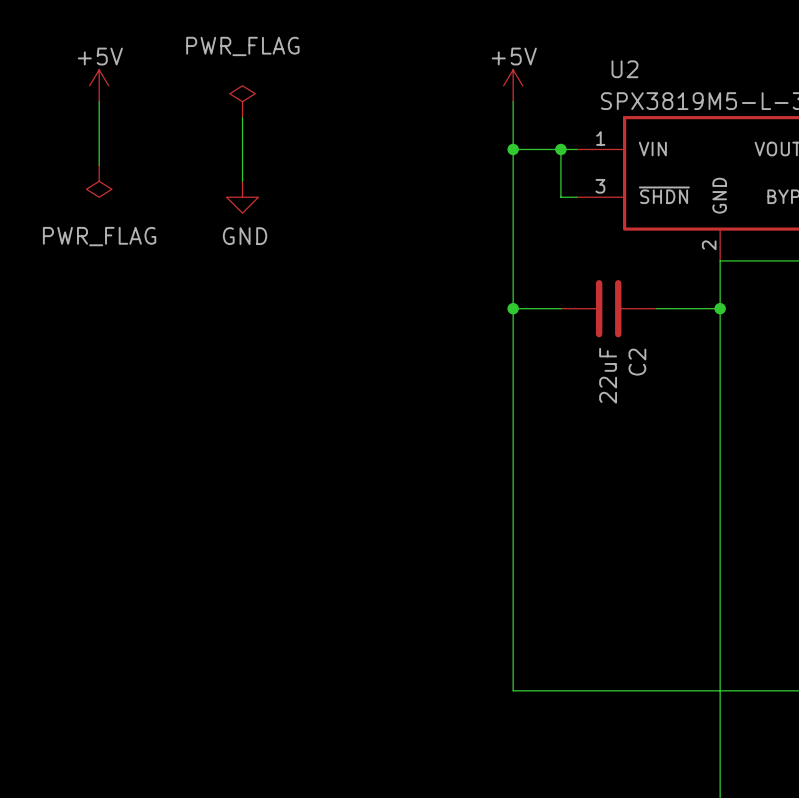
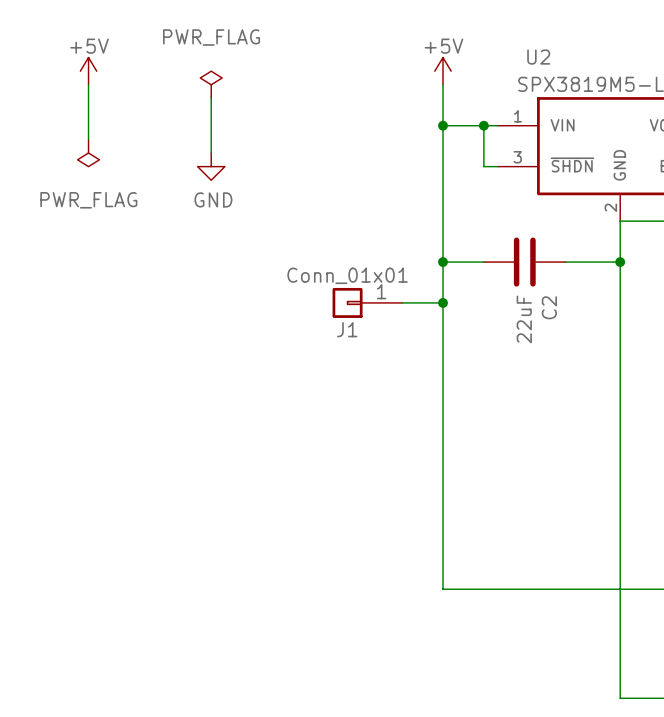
J1: none -> Conn_01x01 (367, 302)
wire: none -> (402, 302) (442, 302)
junction: none -> (442, 302)

